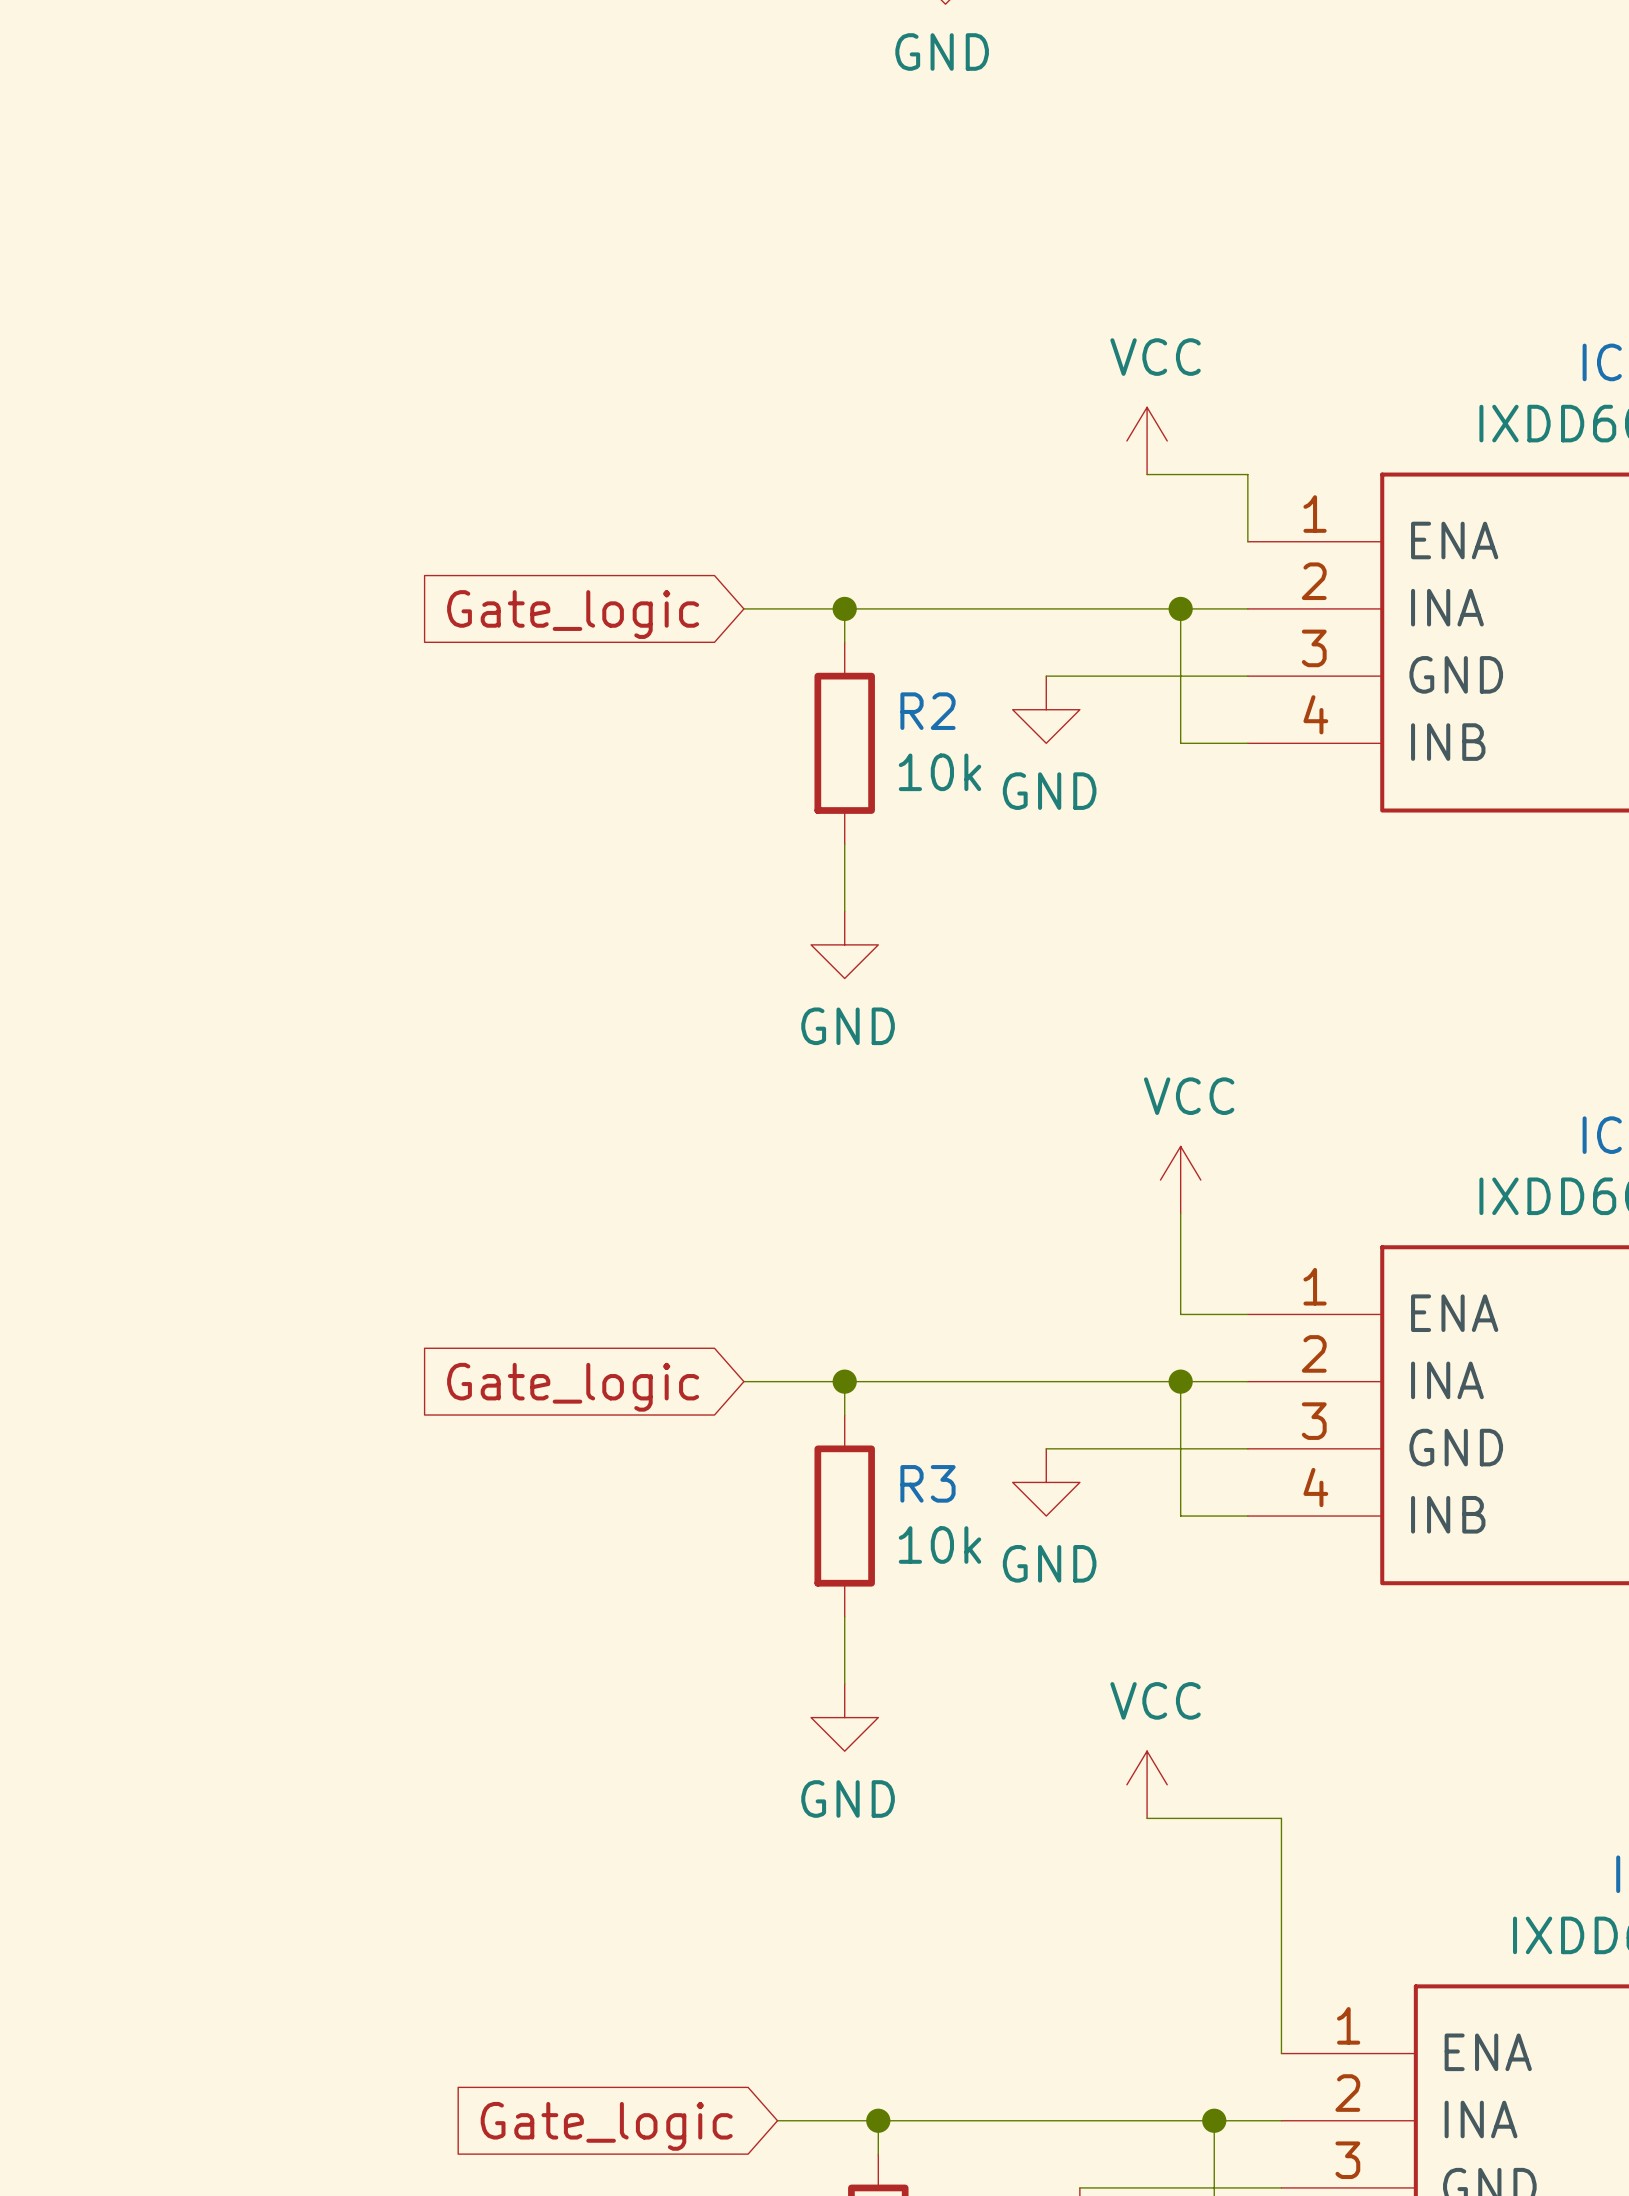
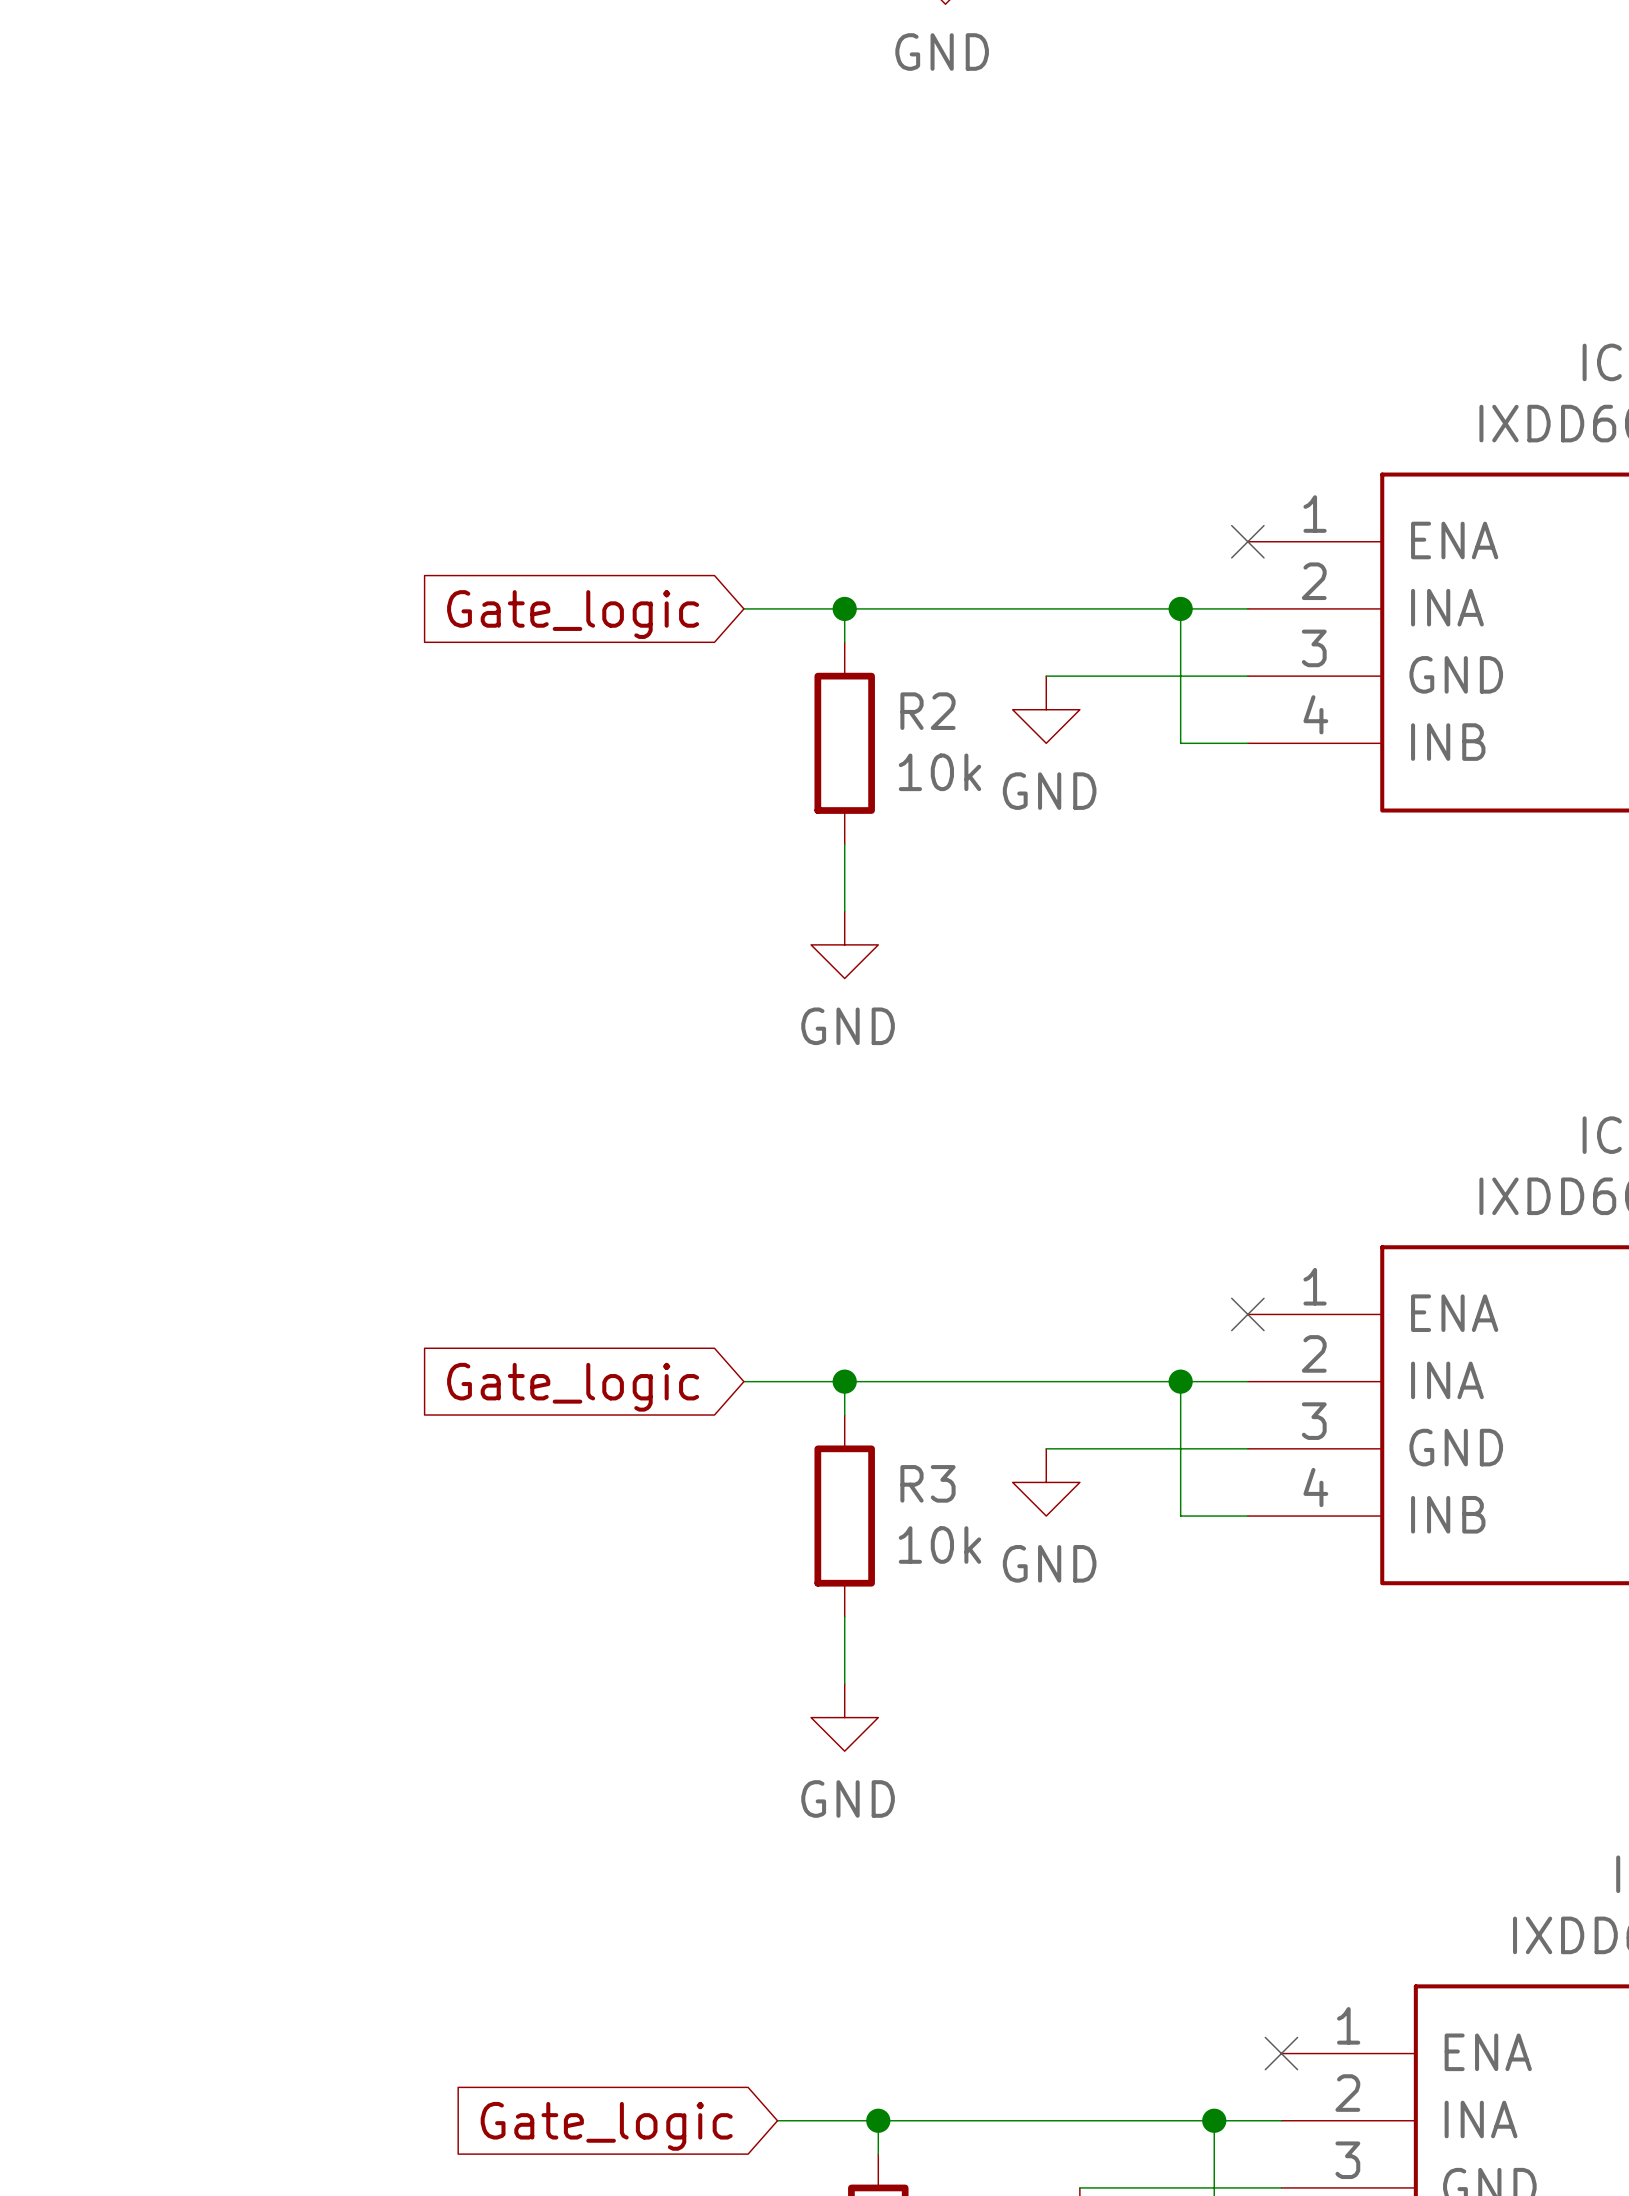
power symbol: VCC (1147, 440) -> none
wire: (1147, 474) (1247, 474) (1247, 541) -> none
no-connect mark: none -> (1247, 541)
power symbol: VCC (1180, 1180) -> none
wire: (1180, 1213) (1180, 1314) (1247, 1314) -> none
no-connect mark: none -> (1247, 1314)
power symbol: VCC (1147, 1784) -> none
wire: (1147, 1818) (1281, 1818) (1281, 2053) -> none
no-connect mark: none -> (1281, 2053)

